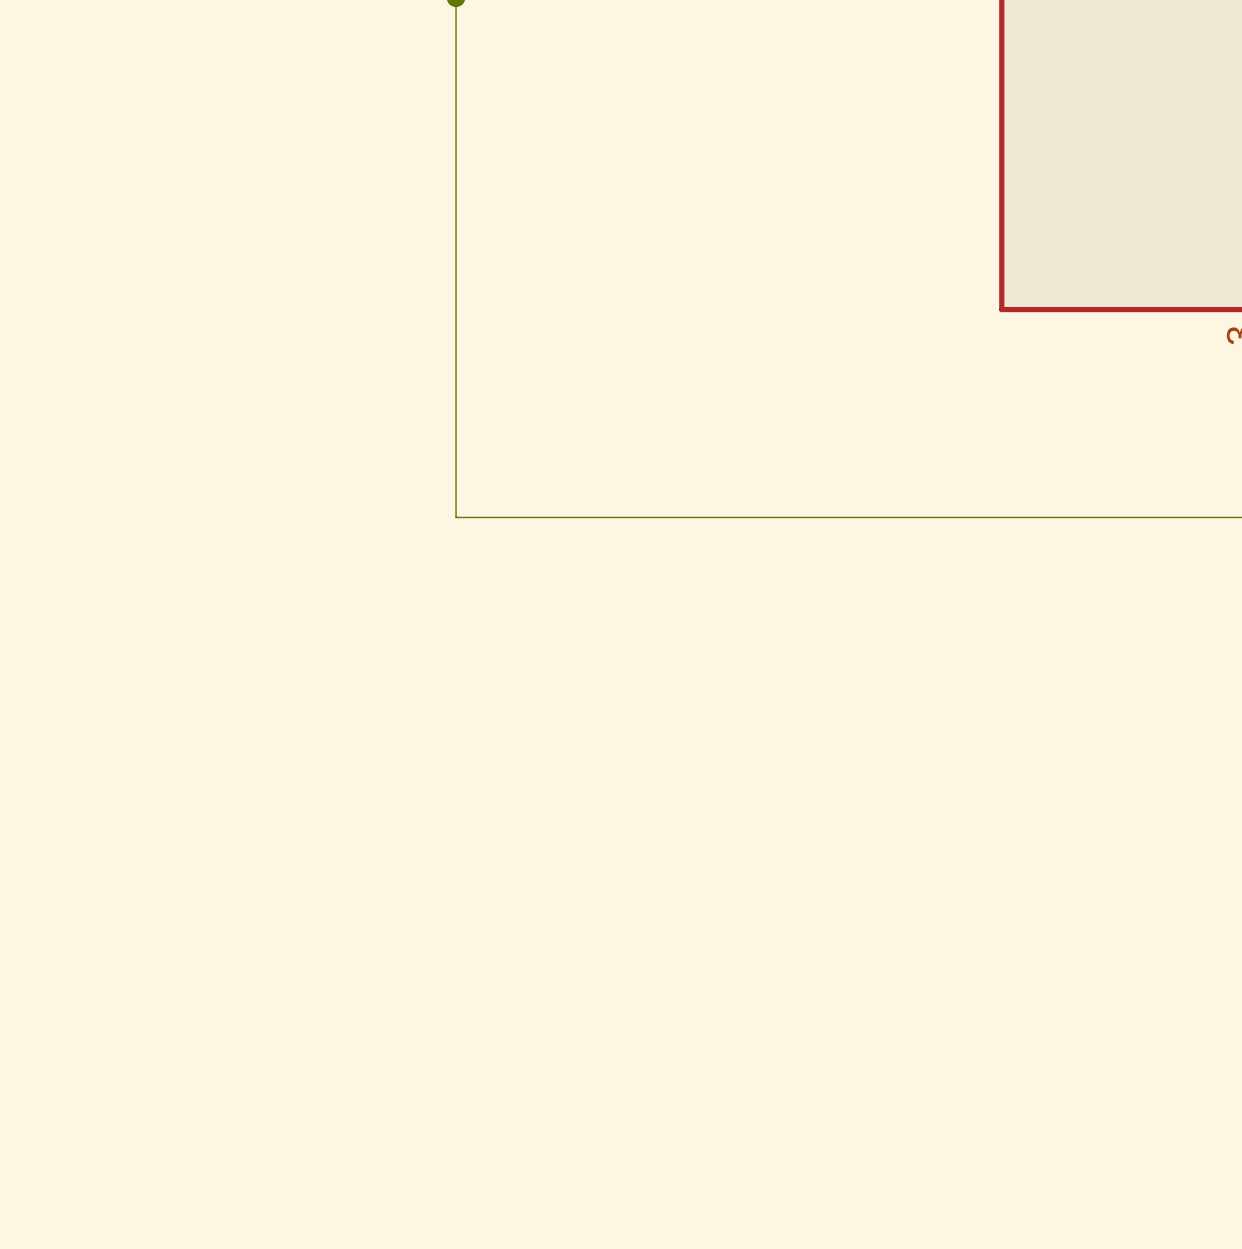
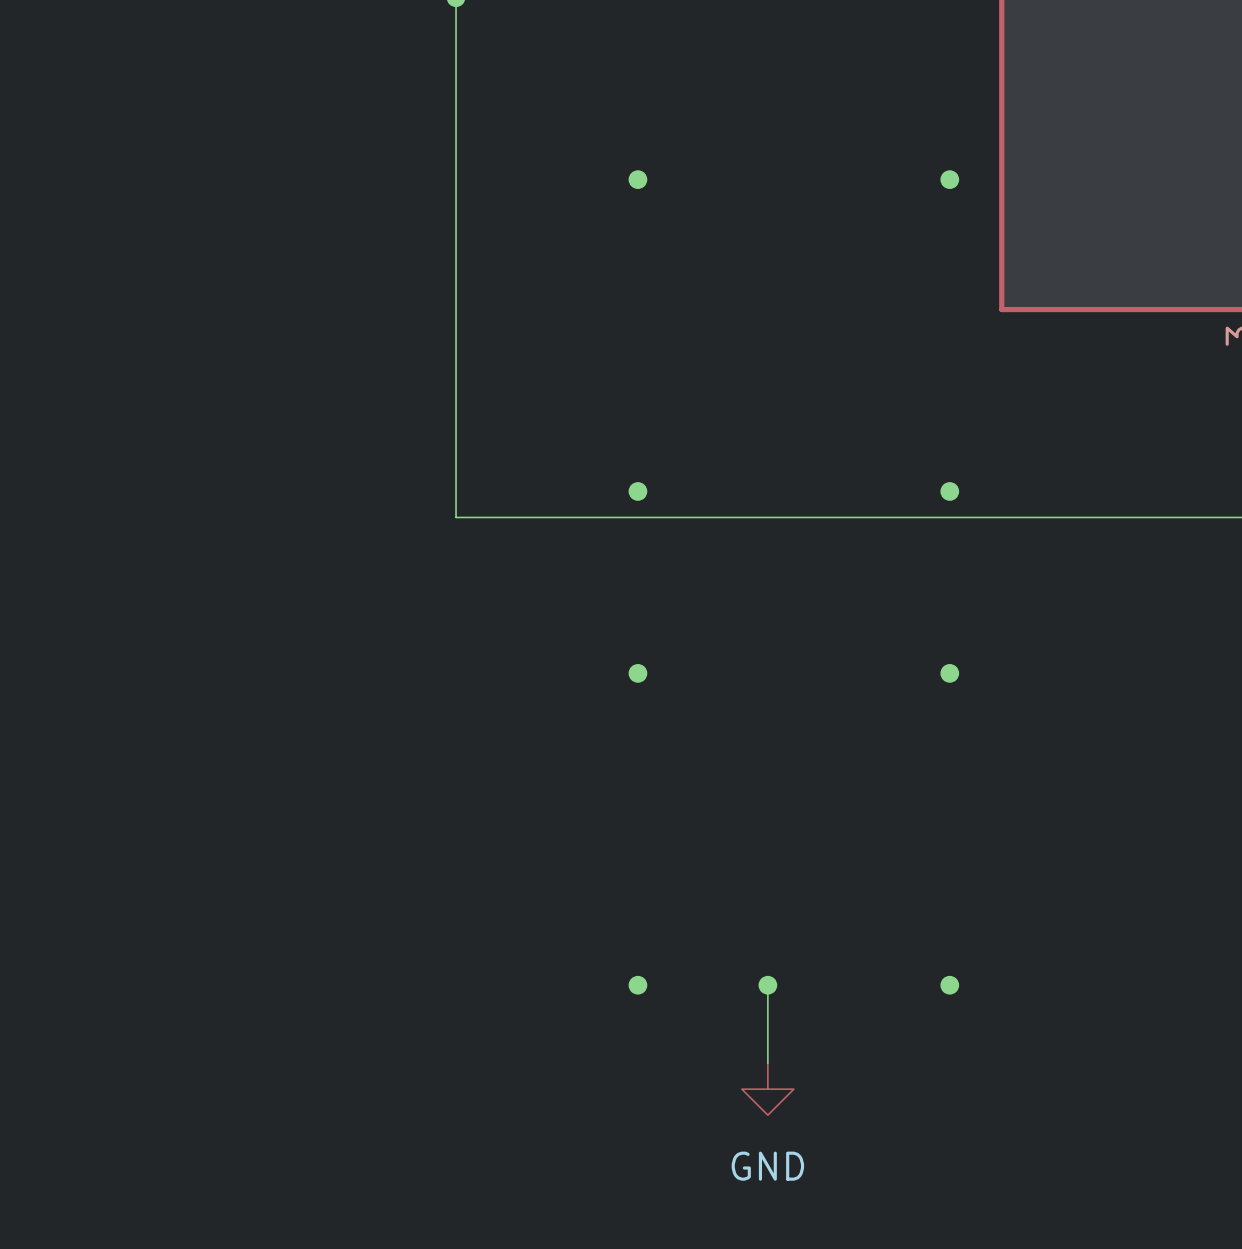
junction: none -> (637, 179)
junction: none -> (949, 179)
junction: none -> (637, 491)
junction: none -> (949, 491)
junction: none -> (637, 673)
junction: none -> (949, 673)
junction: none -> (637, 985)
wire: none -> (767, 985) (767, 1063)
junction: none -> (767, 985)
junction: none -> (949, 985)
power symbol: none -> GND (767, 1089)

